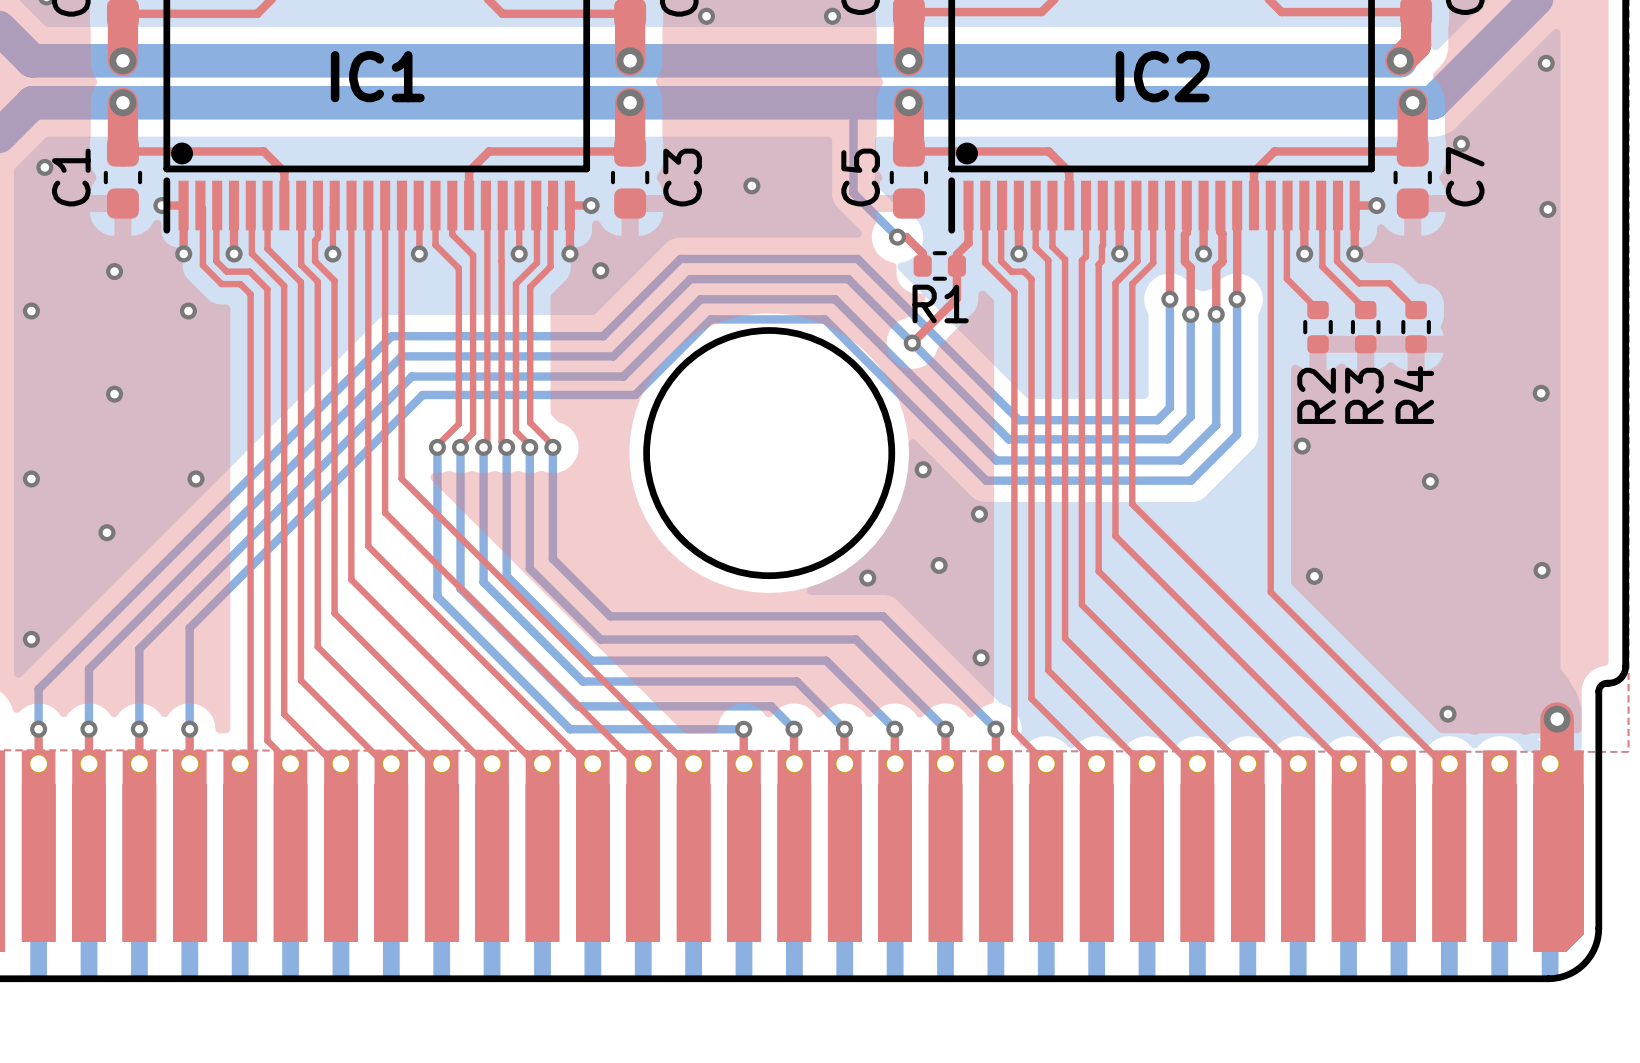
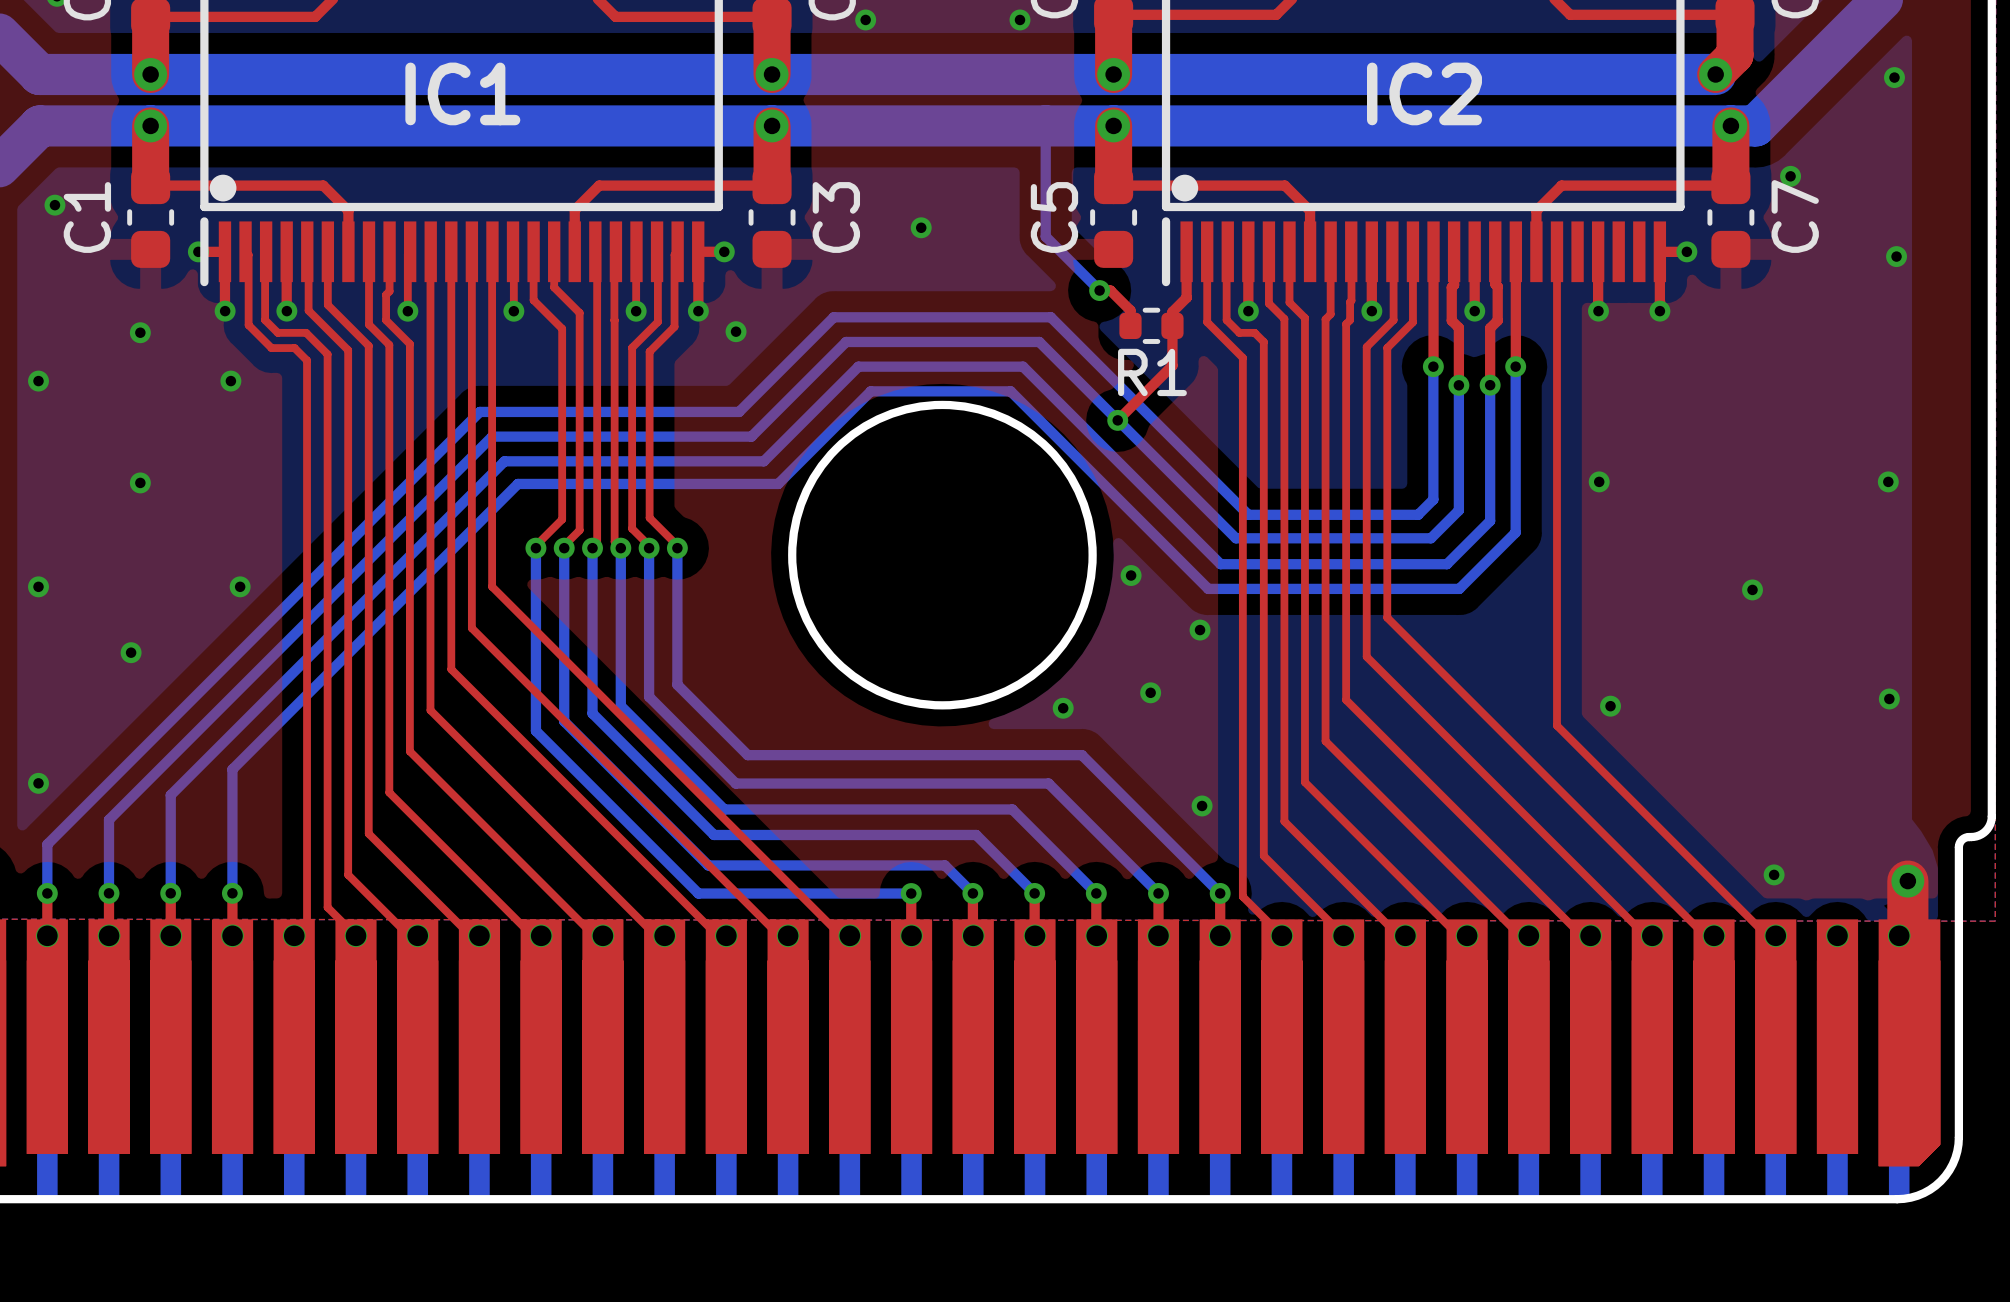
top track: (1287, 205) (1286, 278) (1318, 310) -> none
top track: (1321, 205) (1322, 266) (1365, 310) -> none
top track: (1337, 205) (1337, 261) (1358, 283) (1389, 283) (1416, 310) -> none
R2: (1318, 327) -> none
R3: (1365, 327) -> none
R4: (1416, 327) -> none
via position: (1302, 446) -> (1599, 481)

